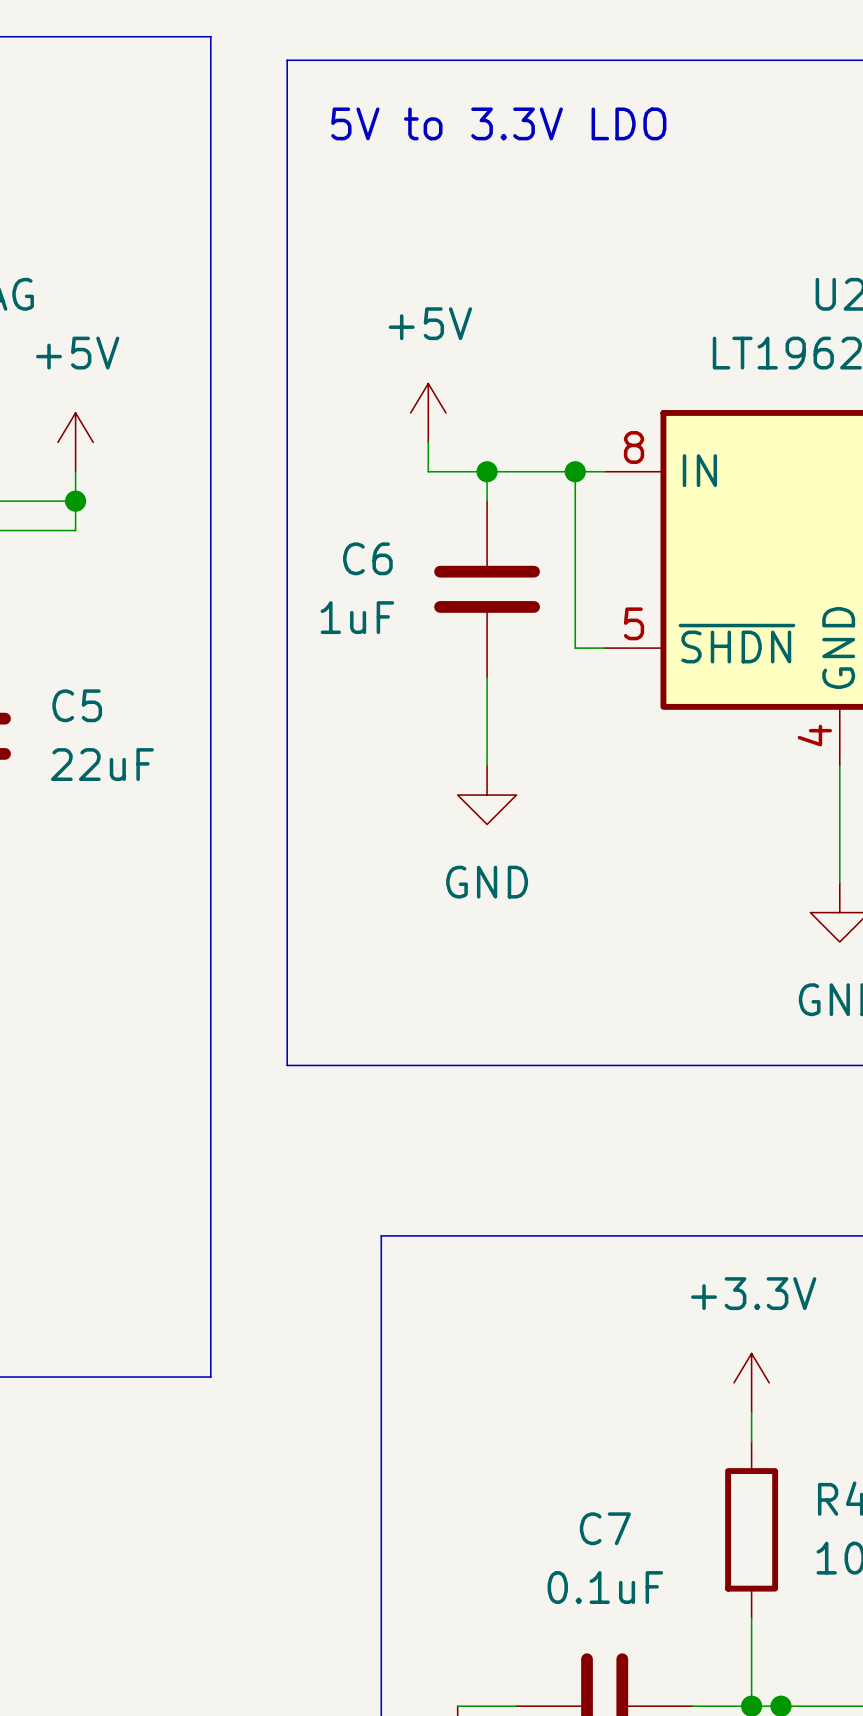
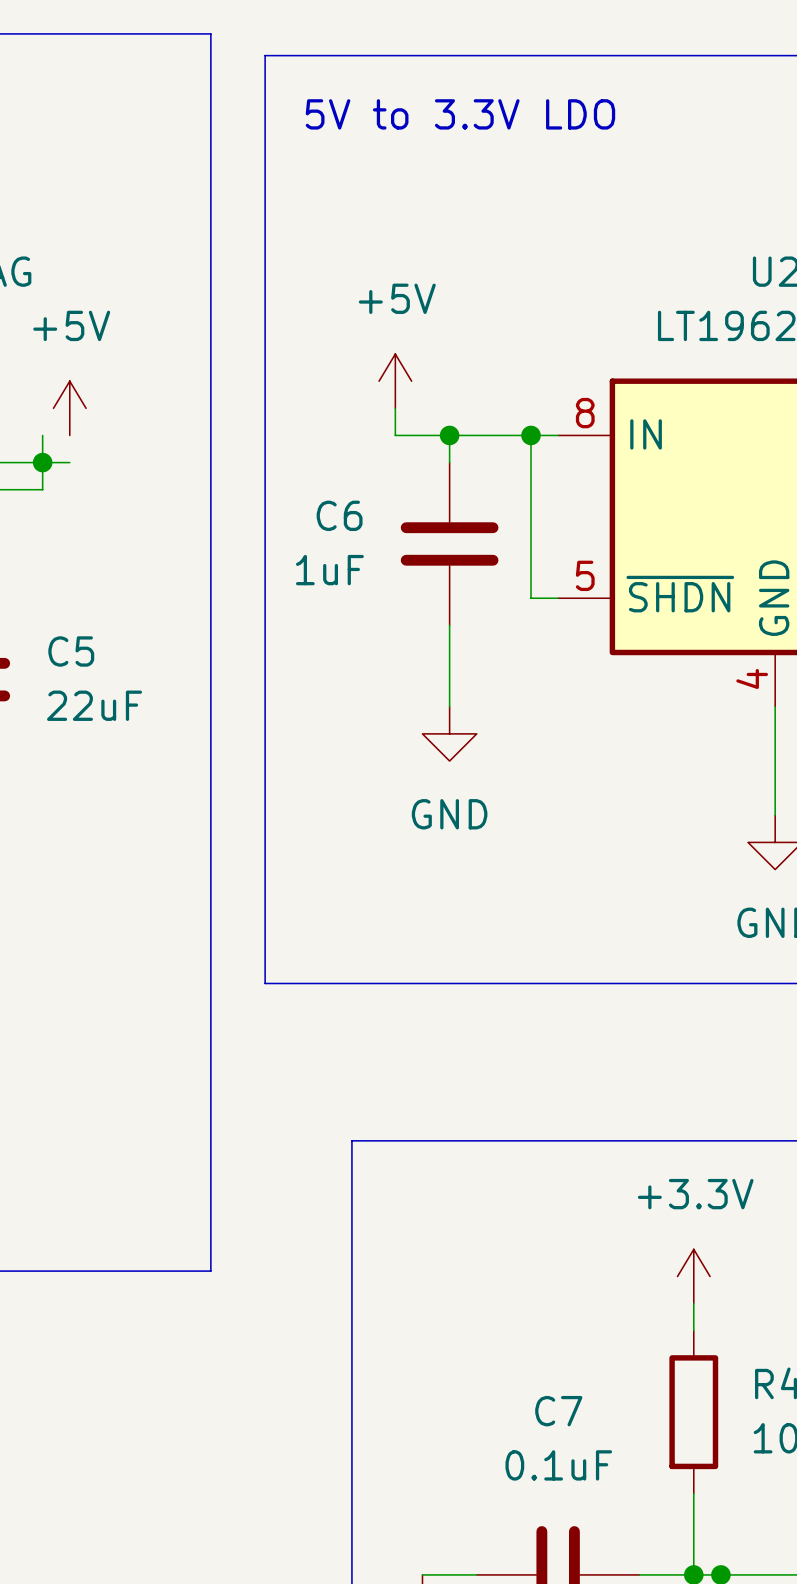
line: (210, 36) (210, 1377) -> (194, 33) (210, 33) (210, 1271) (194, 1271)
wire: (75, 471) (75, 530) (46, 530) -> (42, 435) (42, 489)
junction position: (75, 501) -> (42, 462)

